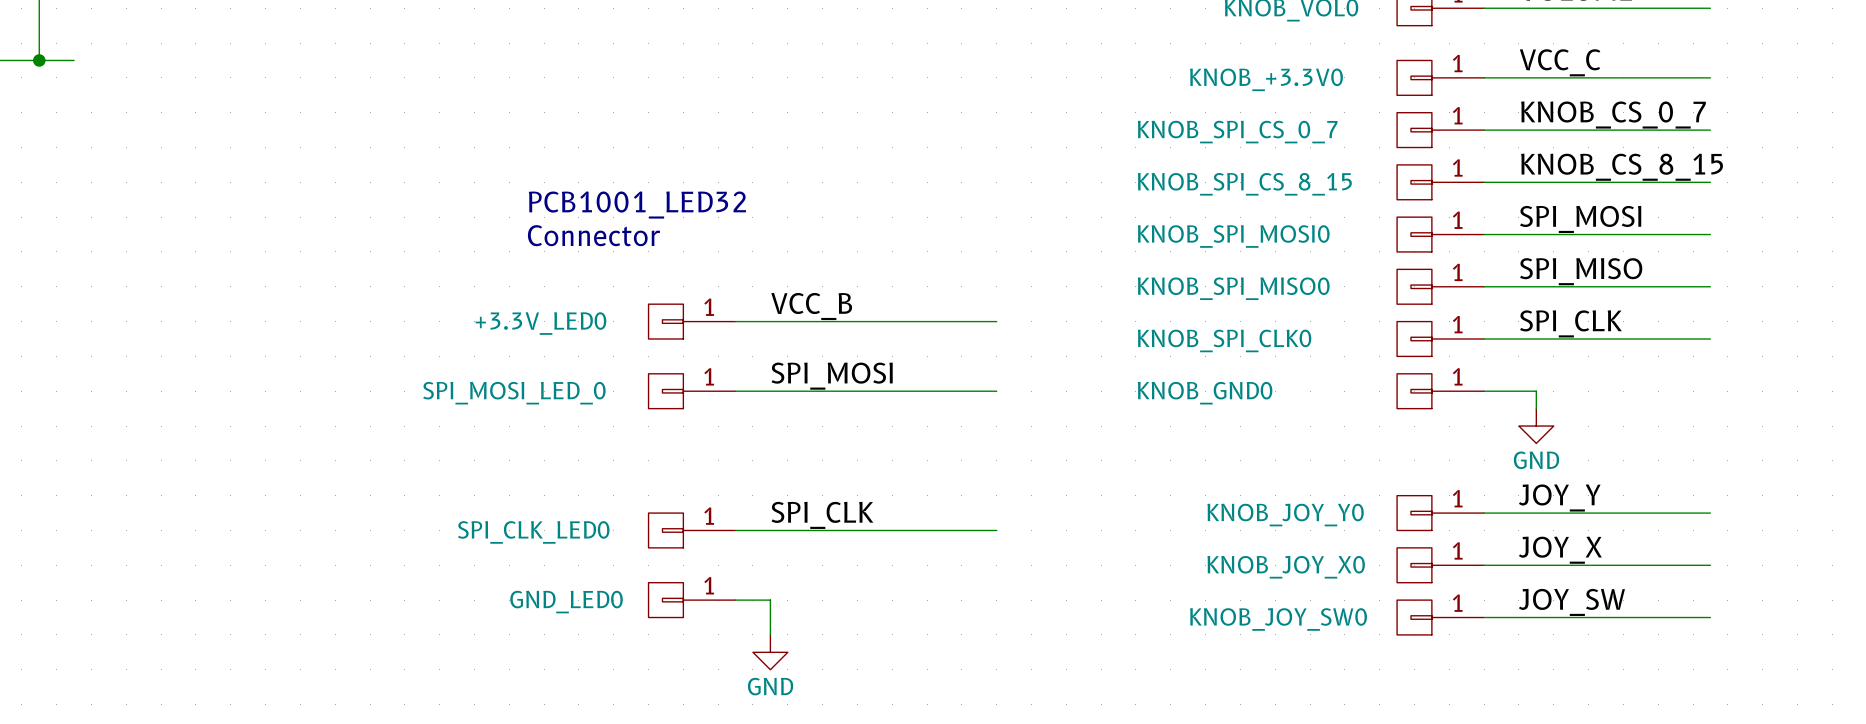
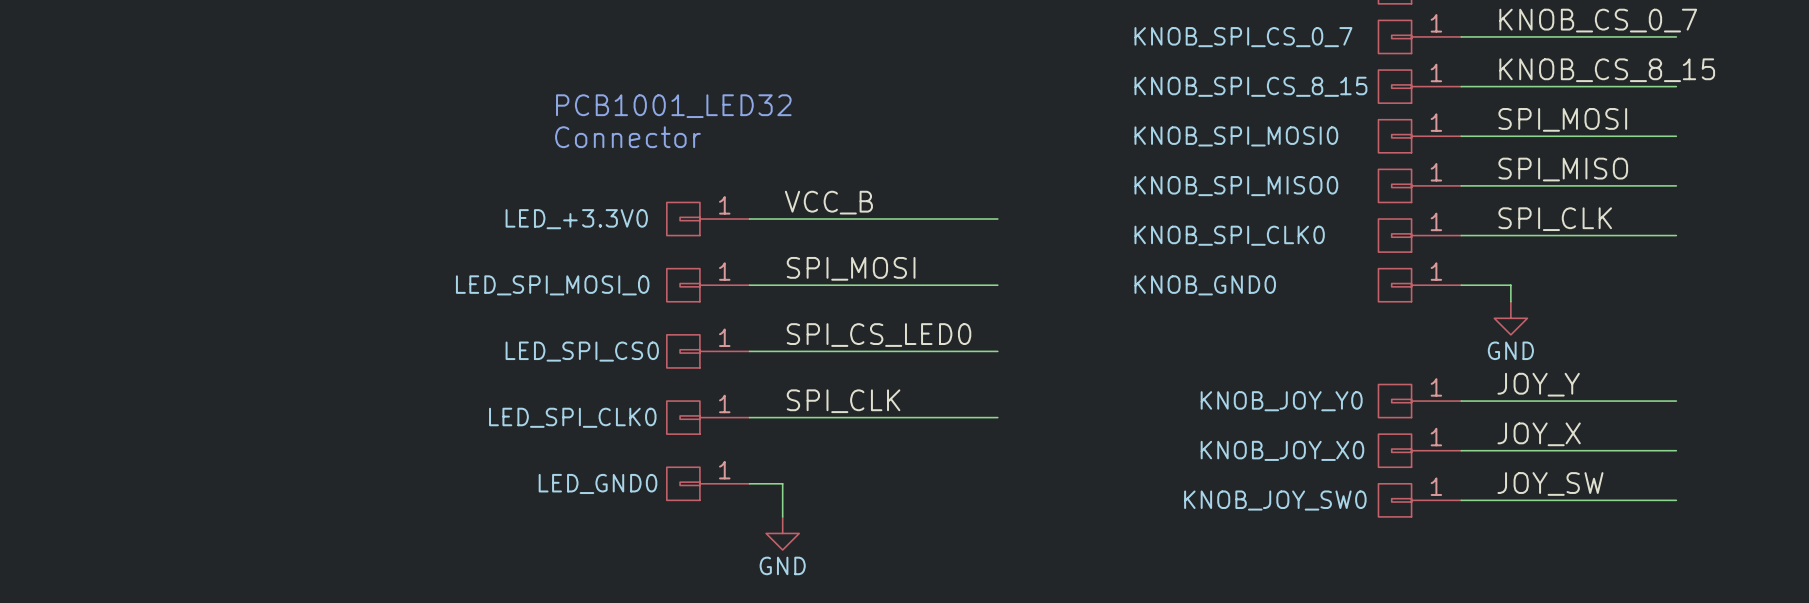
+3.3V_LED0 name: +3.3V_LED0 (540, 323) -> LED_+3.3V0 (576, 219)
SPI_MOSI_LED_0 name: SPI_MOSI_LED_0 (514, 393) -> LED_SPI_MOSI_0 (552, 285)
label: none -> SPI_CS_LED0 (879, 335)
LED_SPI_CS0: none -> (708, 351)
wire: none -> (749, 351) (997, 351)
SPI_CLK_LED0 name: SPI_CLK_LED0 (533, 532) -> LED_SPI_CLK0 (572, 417)
GND_LED0 name: GND_LED0 (566, 602) -> LED_GND0 (597, 483)

